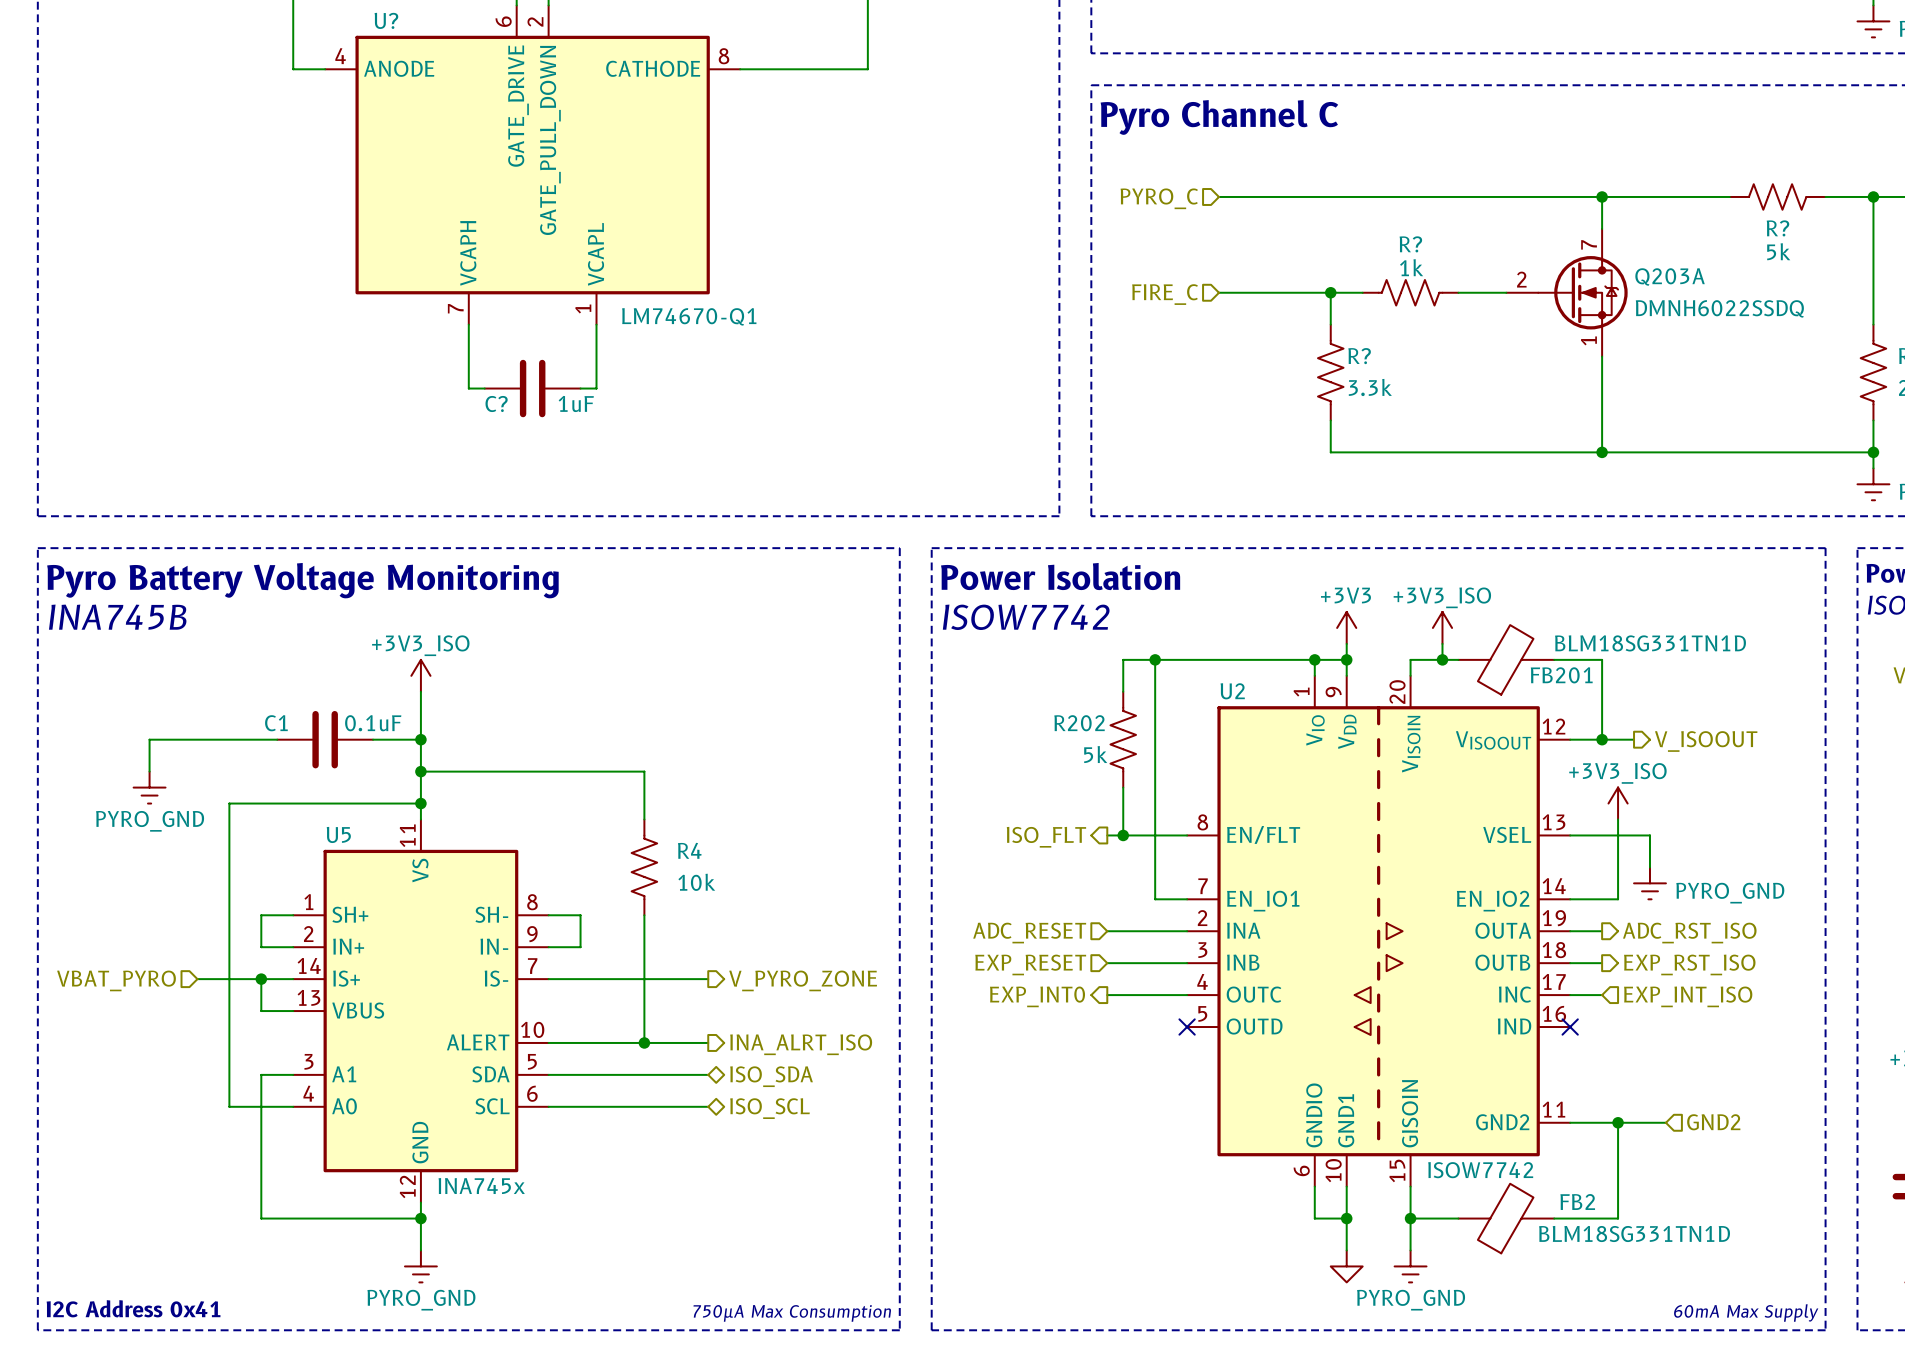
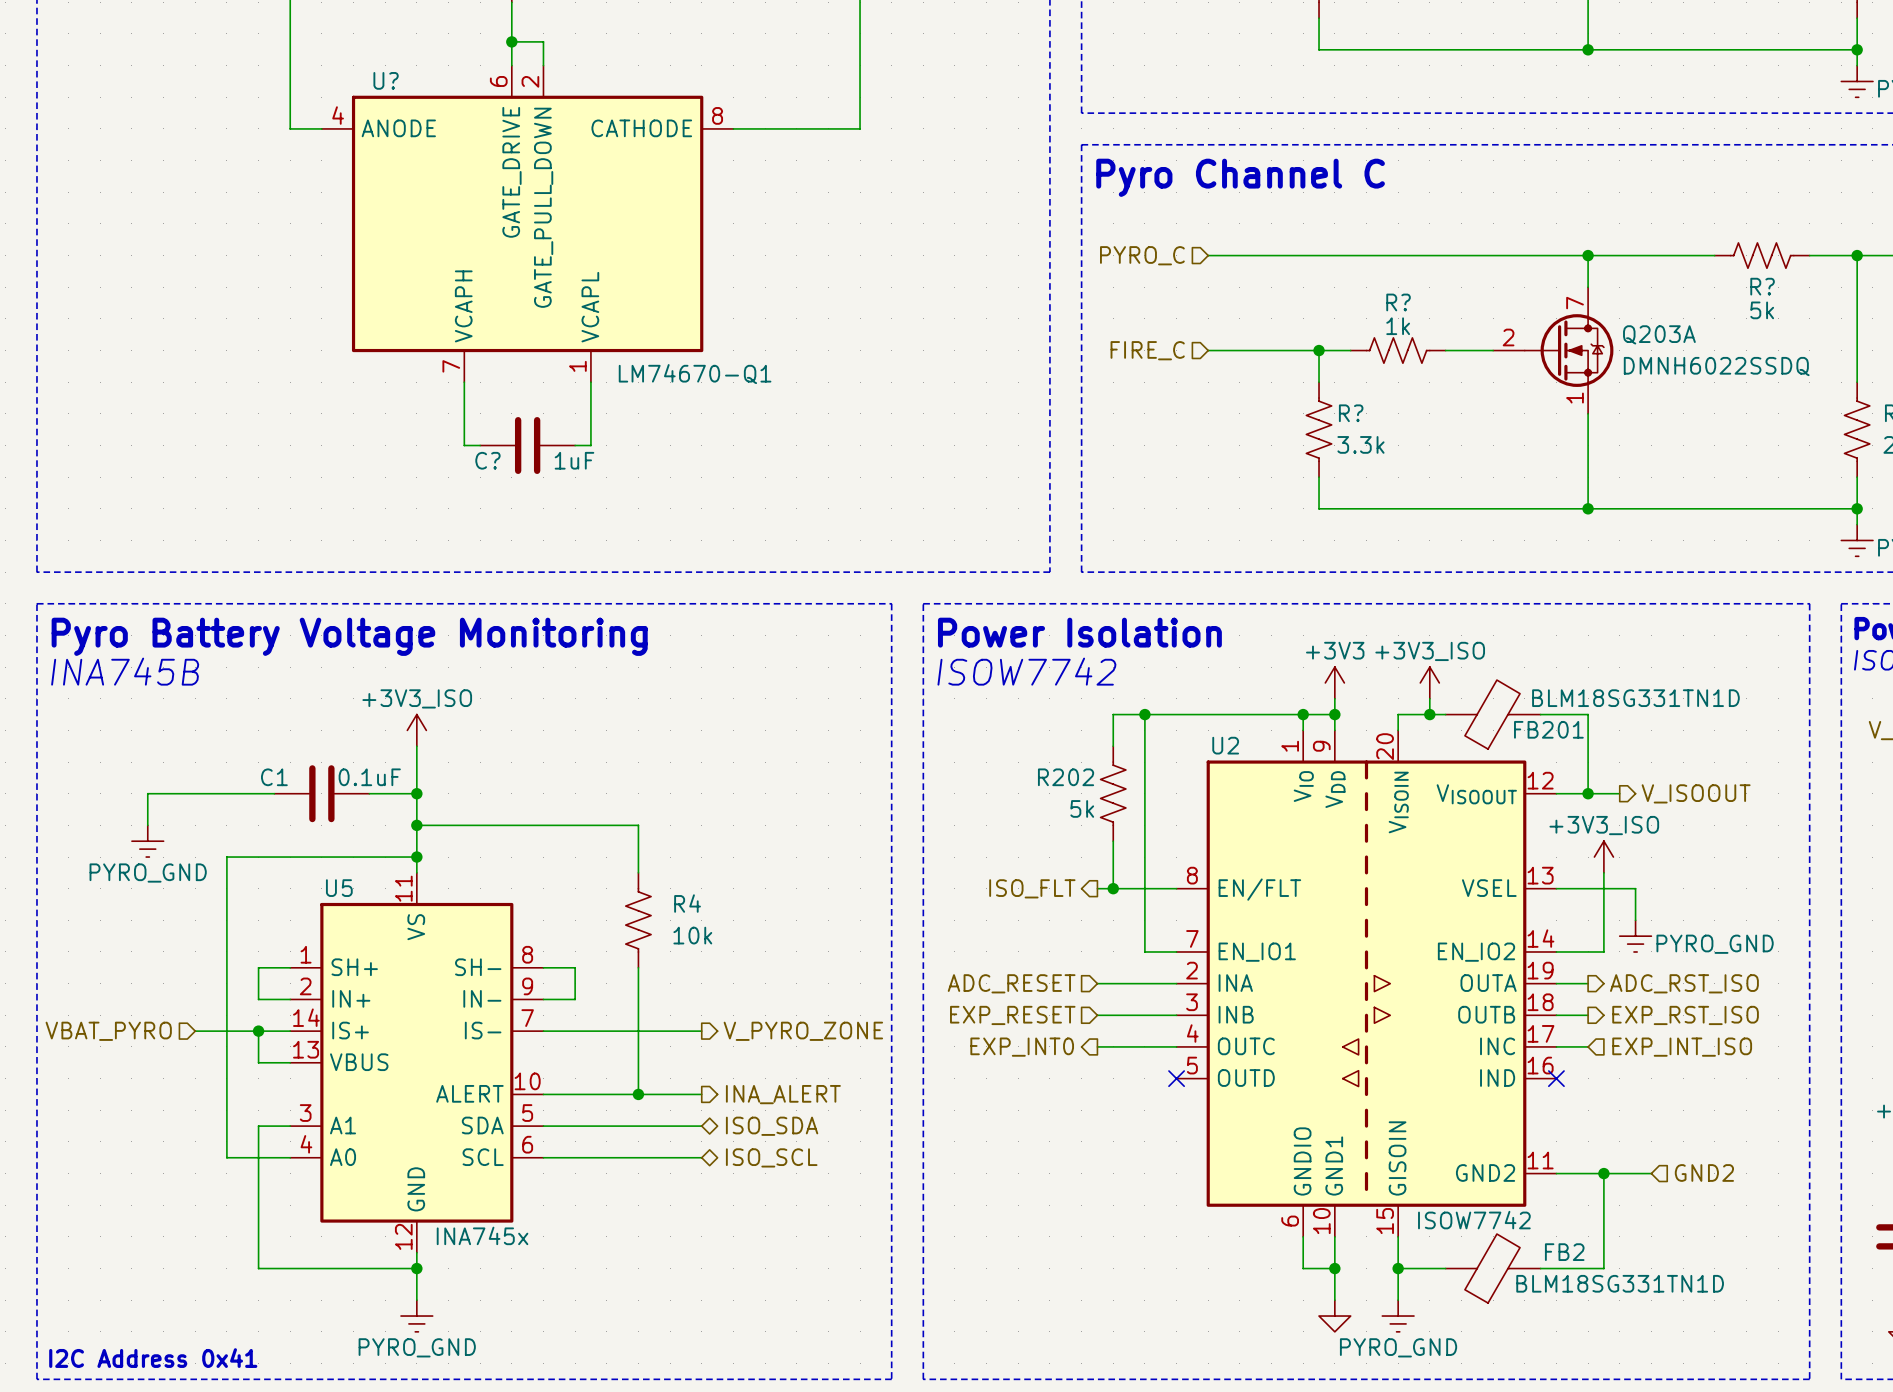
hierarchical label: INA_ALRT_ISO (801, 1044) -> INA_ALERT (783, 1094)
text: 60mA Max Supply (1746, 1312) -> none
text: 750µA Max Consumption (792, 1313) -> none

